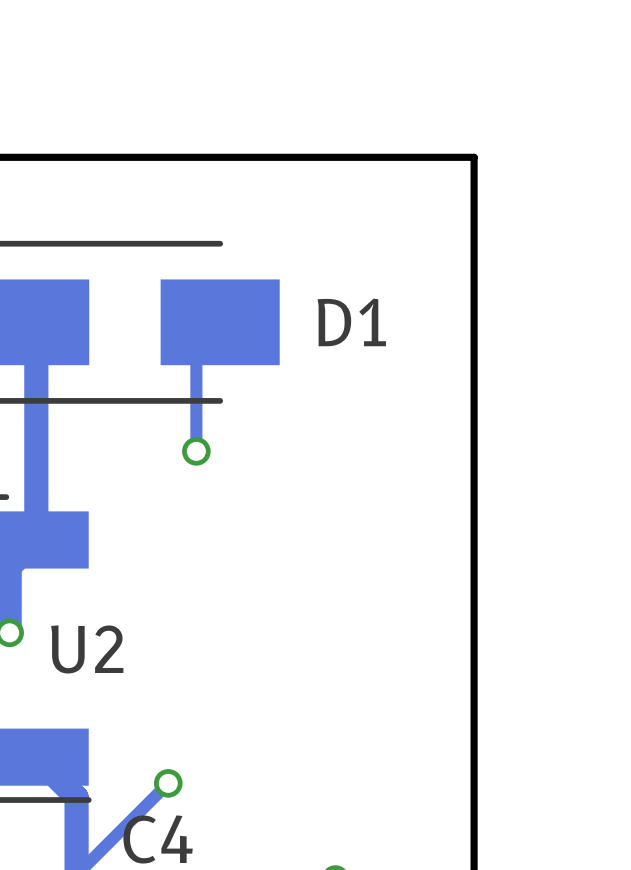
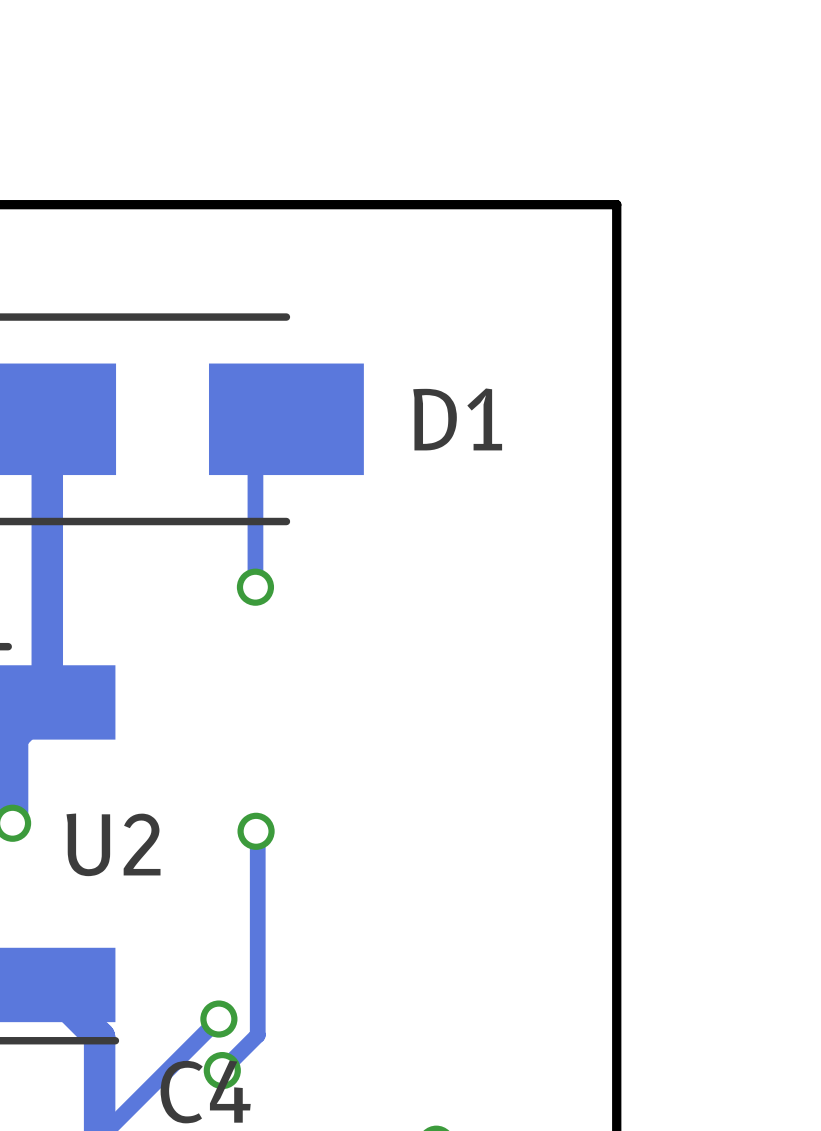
track: none -> (256, 831) (257, 832) (257, 1035) (222, 1070)
via: none -> (256, 831)
via: none -> (222, 1070)

